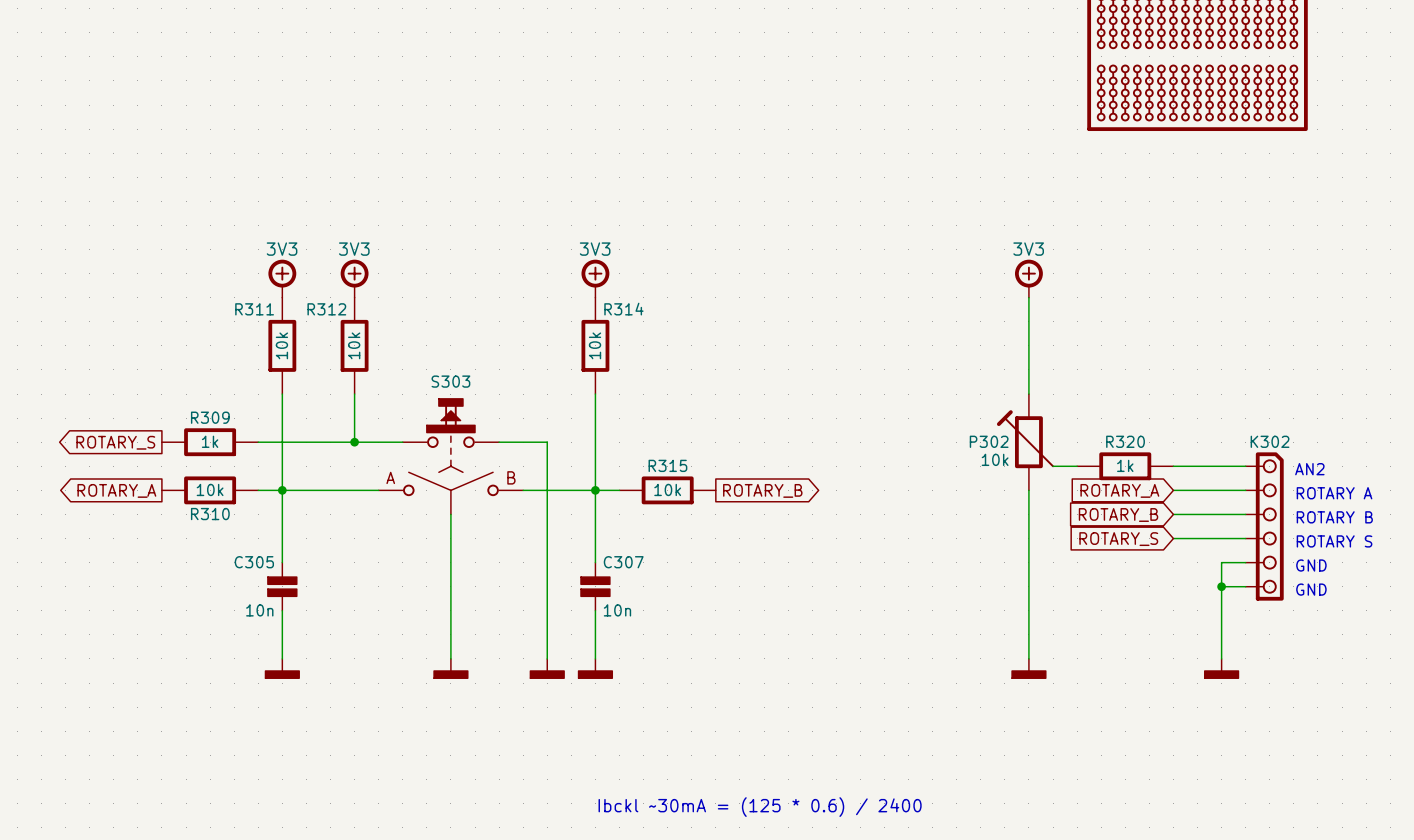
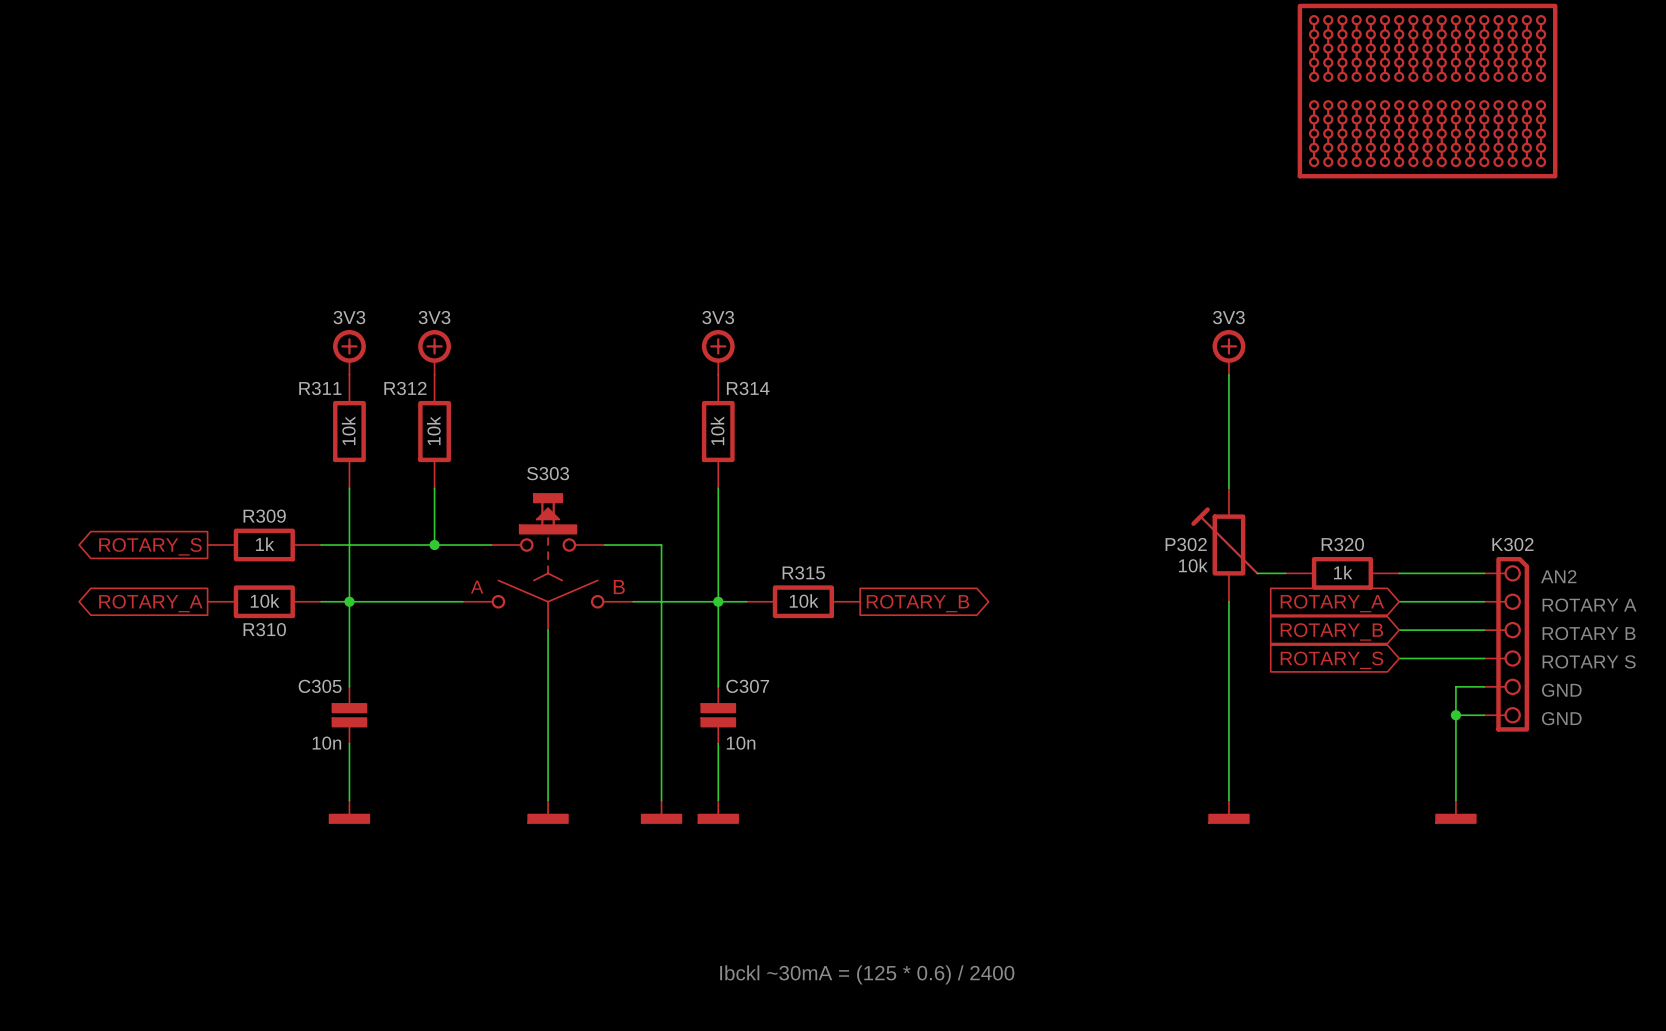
power symbol text: 3V3 (282, 249) -> none
power symbol text: none -> 3V3 (349, 317)
power symbol text: 3V3 (354, 249) -> none
power symbol text: none -> 3V3 (434, 317)
power symbol text: 3V3 (595, 249) -> none
power symbol text: none -> 3V3 (718, 317)
power symbol text: 3V3 (1028, 249) -> none
power symbol text: none -> 3V3 (1228, 317)

